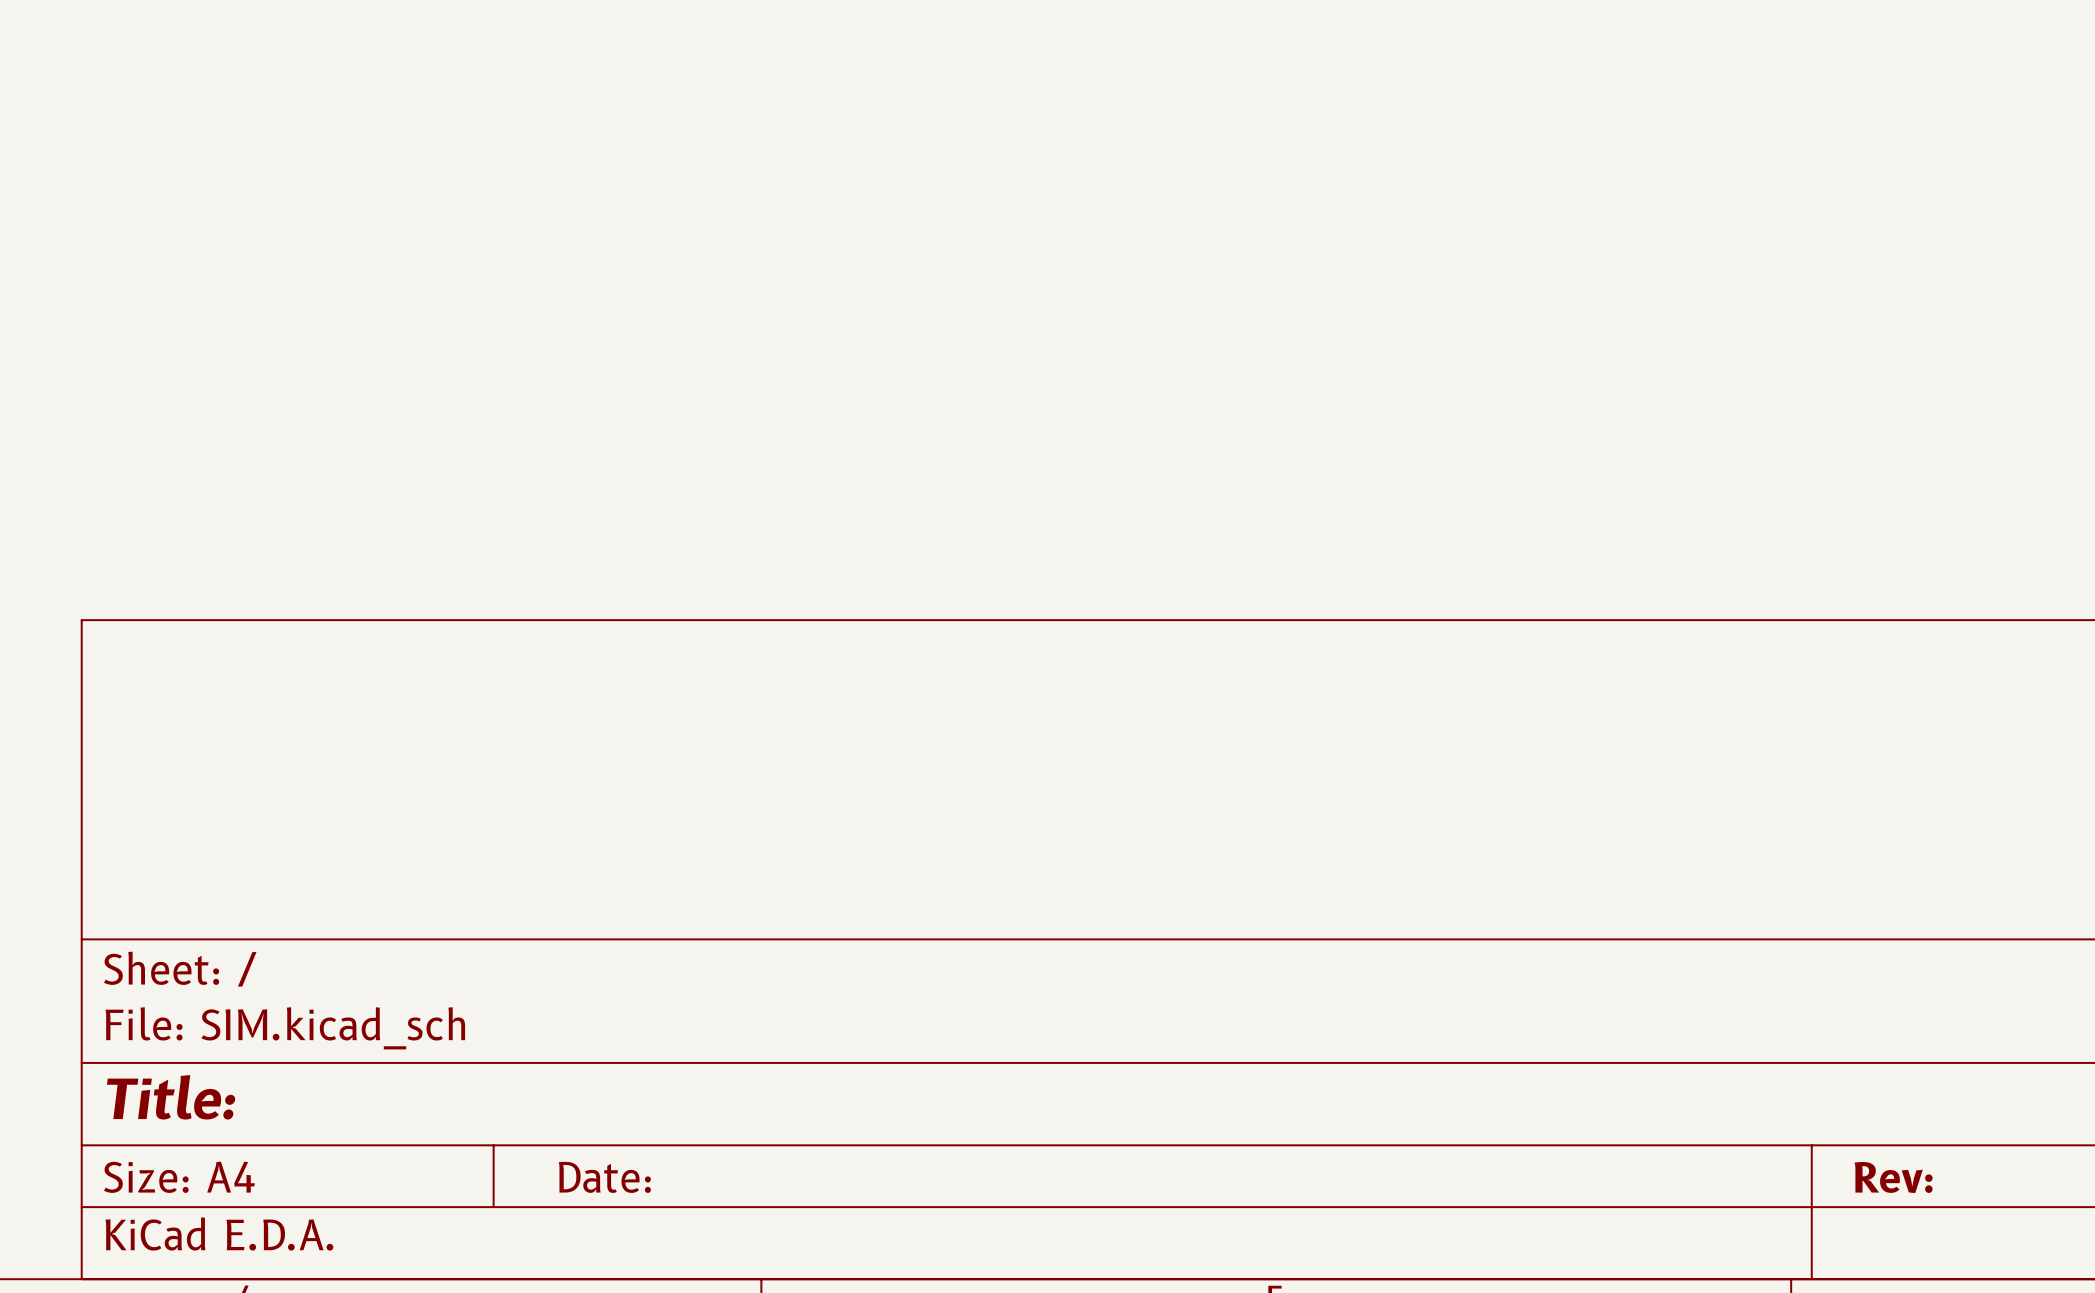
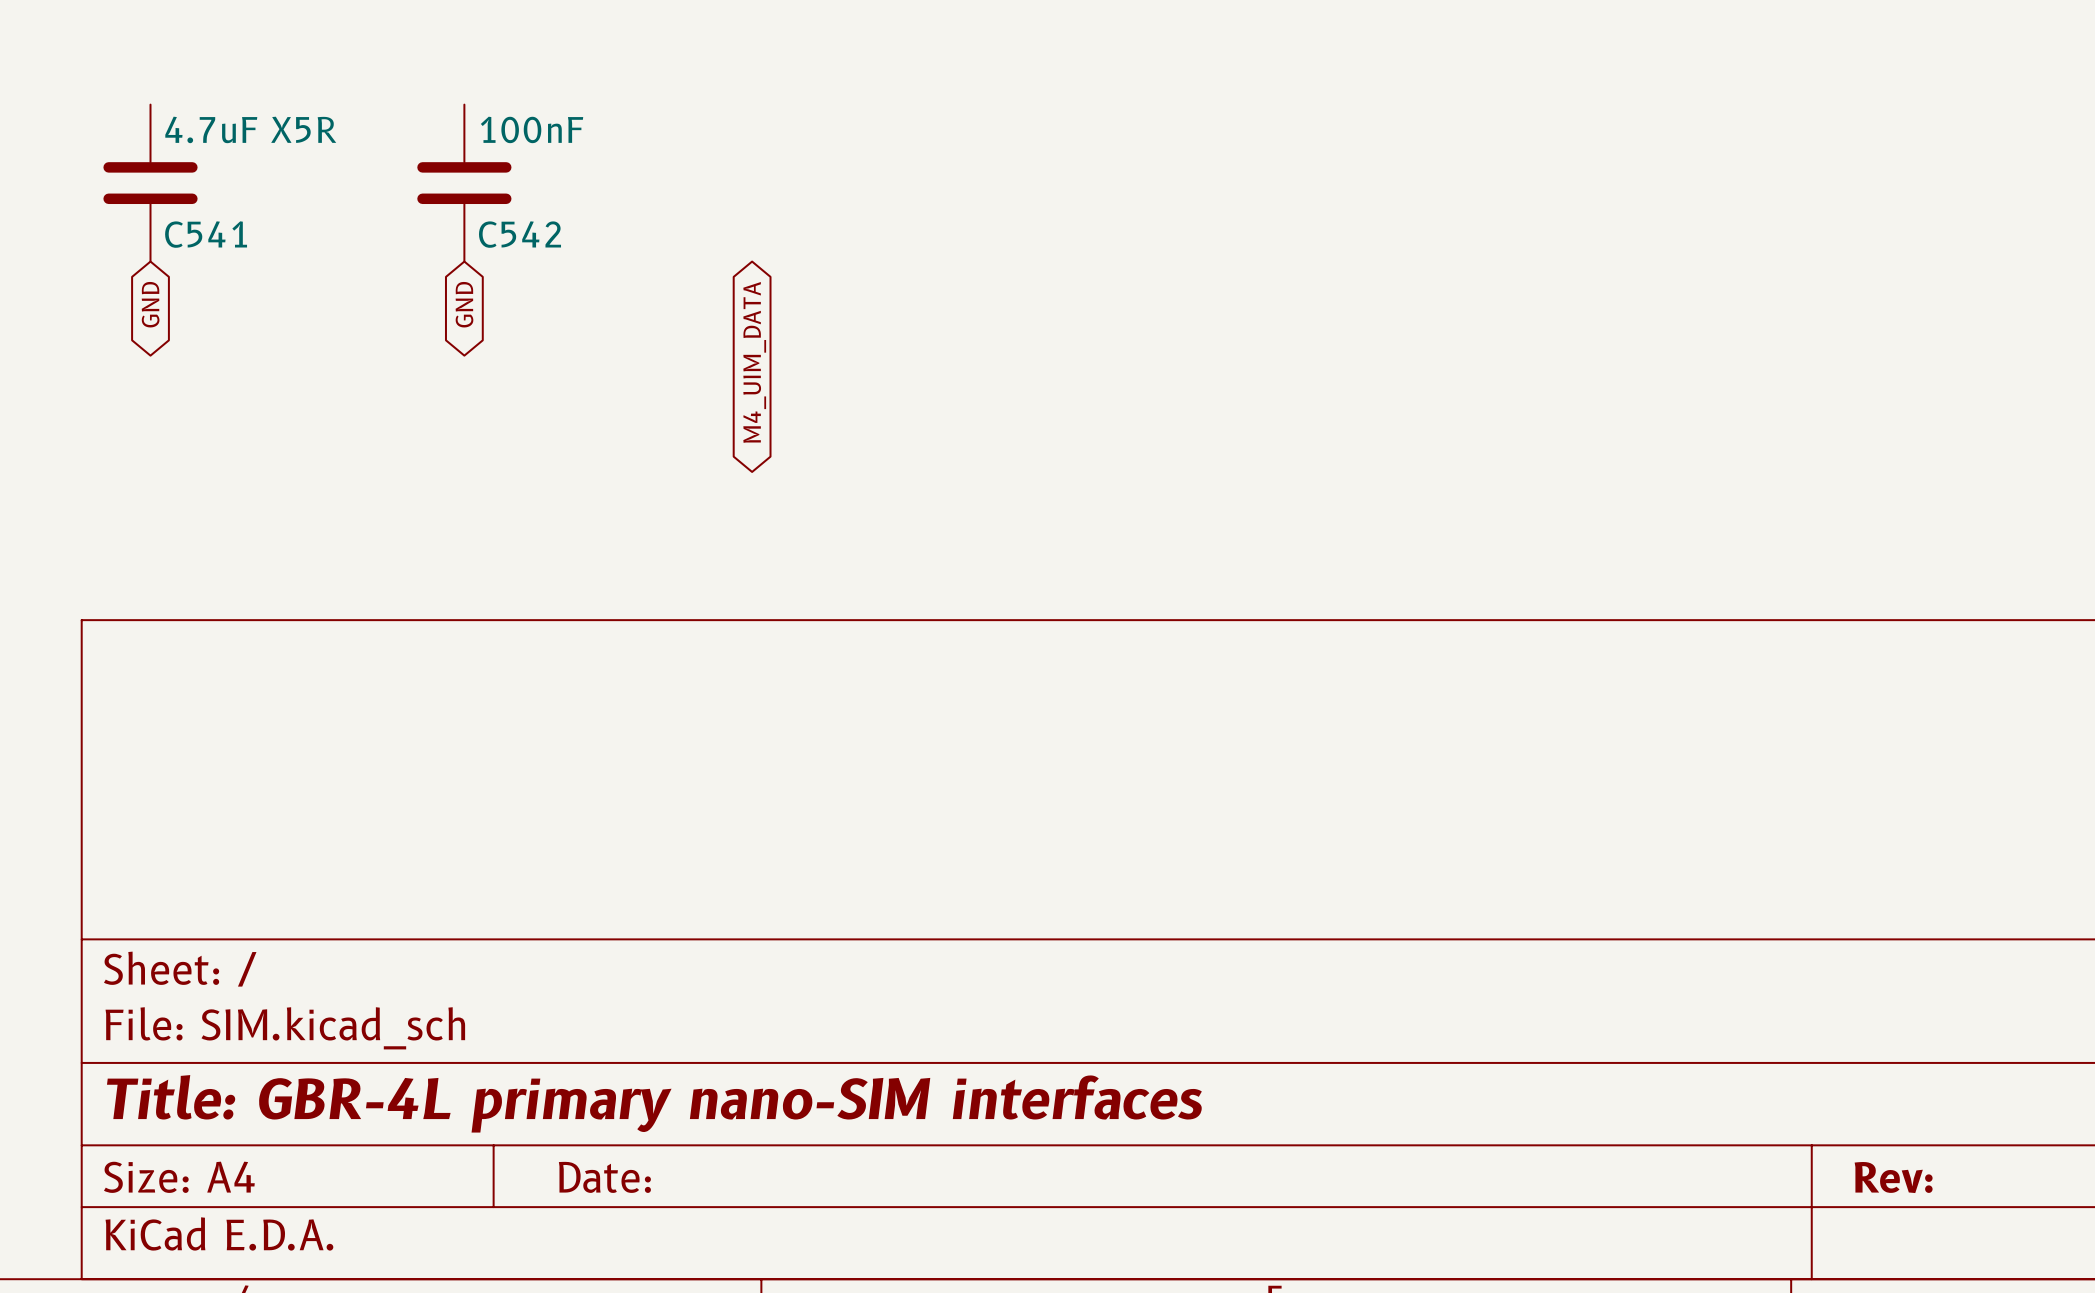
C541: none -> 4.7uF X5R (150, 183)
C542: none -> 100nF (464, 183)
global label: none -> GND (150, 304)
global label: none -> GND (464, 304)
global label: none -> M4_UIM_DATA (754, 362)
title block: Title: (171, 1097) -> Title: GBR-4L primary nano-SIM interfaces (654, 1103)

